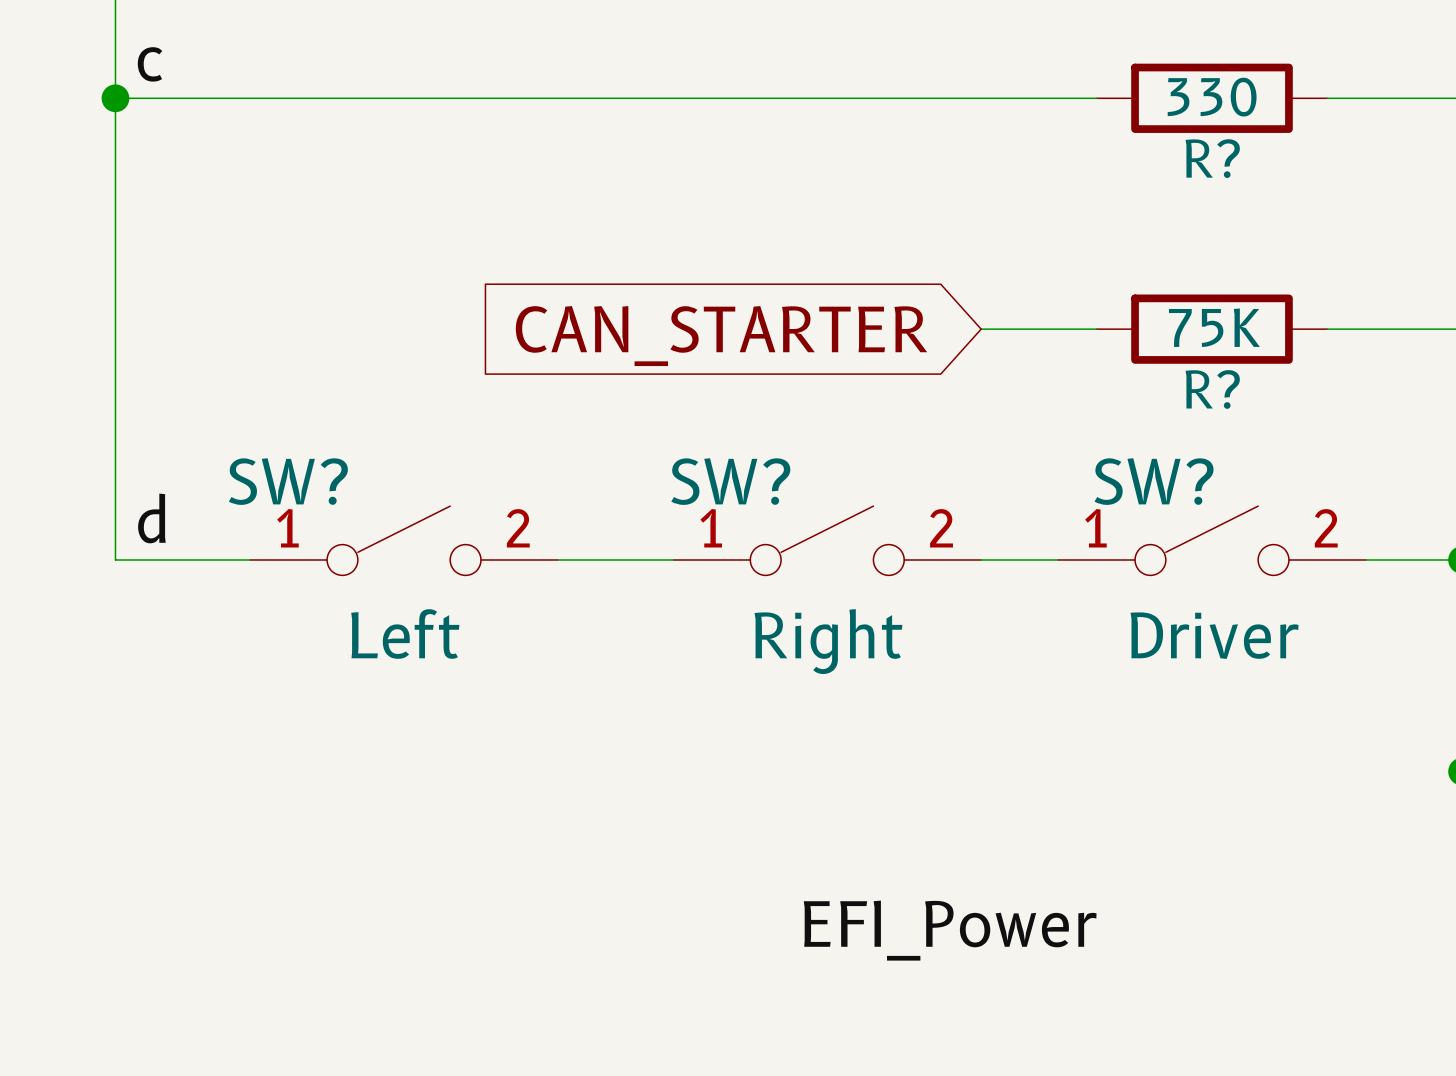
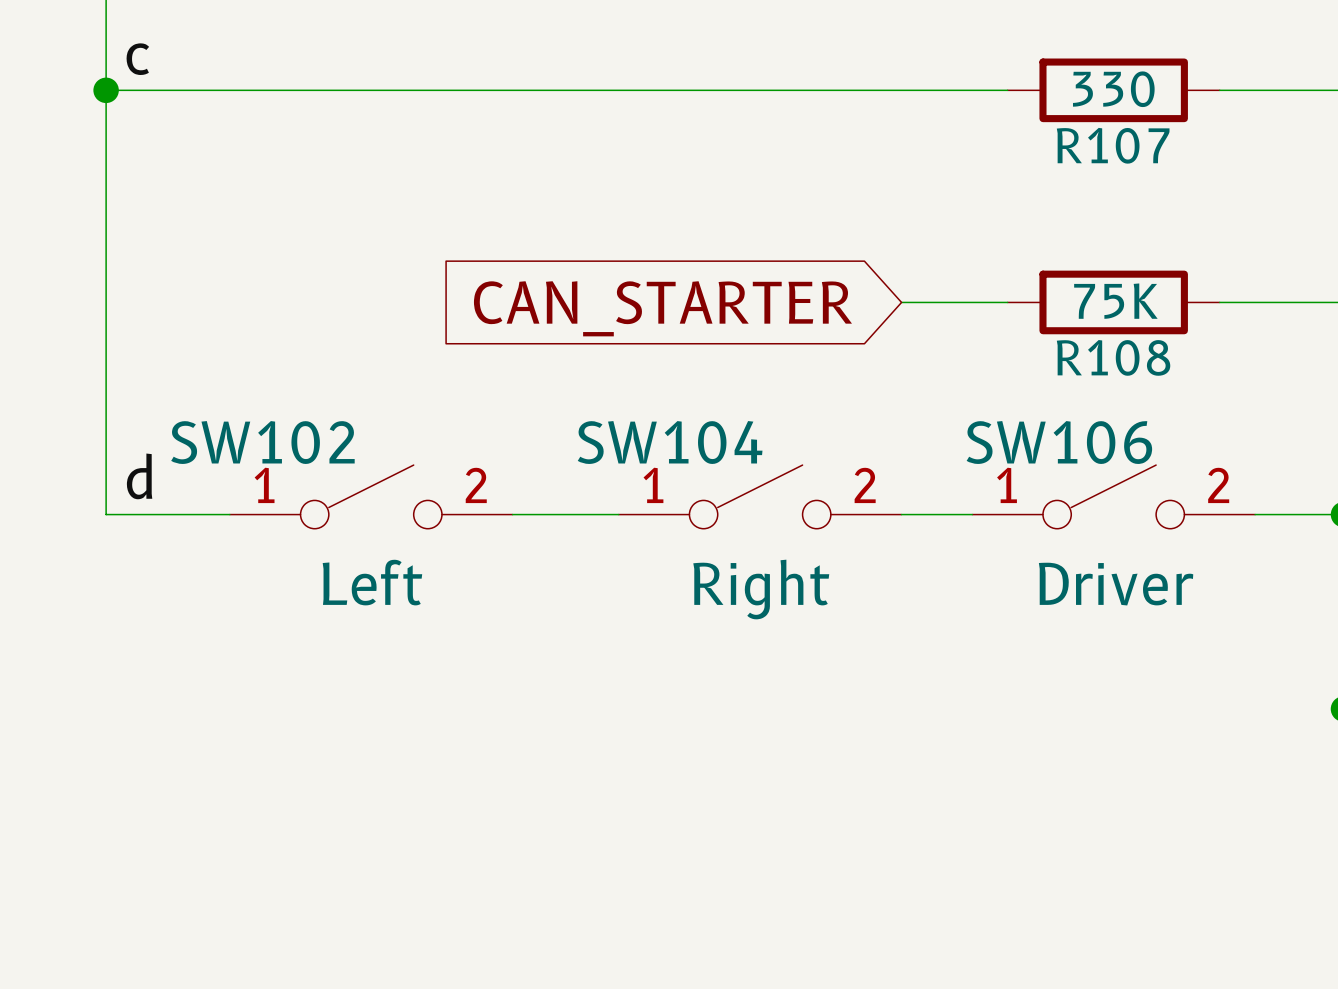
R? name: R? (1212, 158) -> R107 (1113, 145)
R? name: R? (1212, 389) -> R108 (1113, 357)
SW? name: SW? (288, 481) -> SW102 (262, 442)
SW? name: SW? (730, 481) -> SW104 (670, 442)
SW? name: SW? (1154, 481) -> SW106 (1059, 442)
label: EFI_Power (950, 930) -> none

